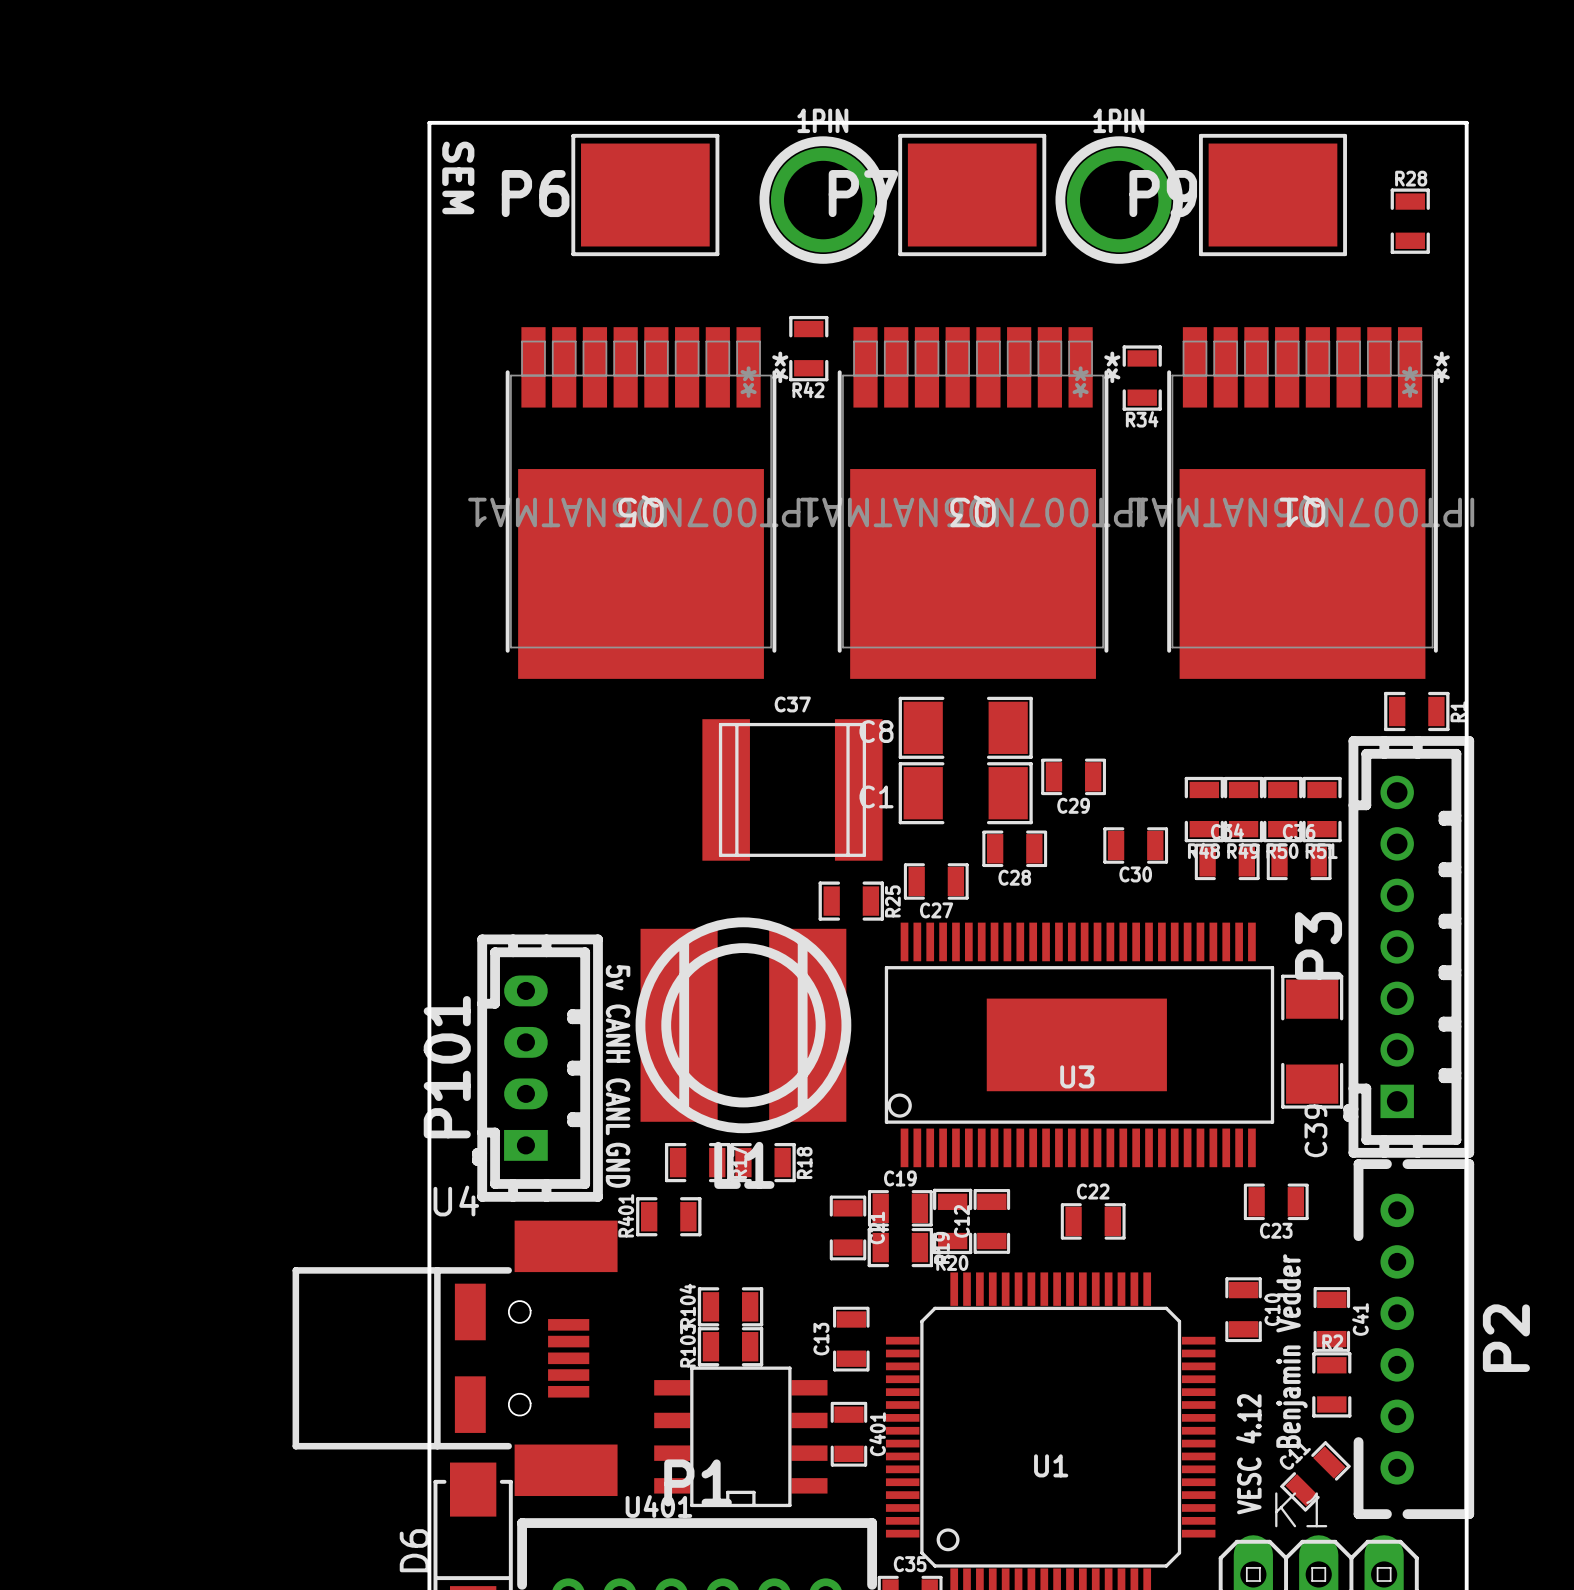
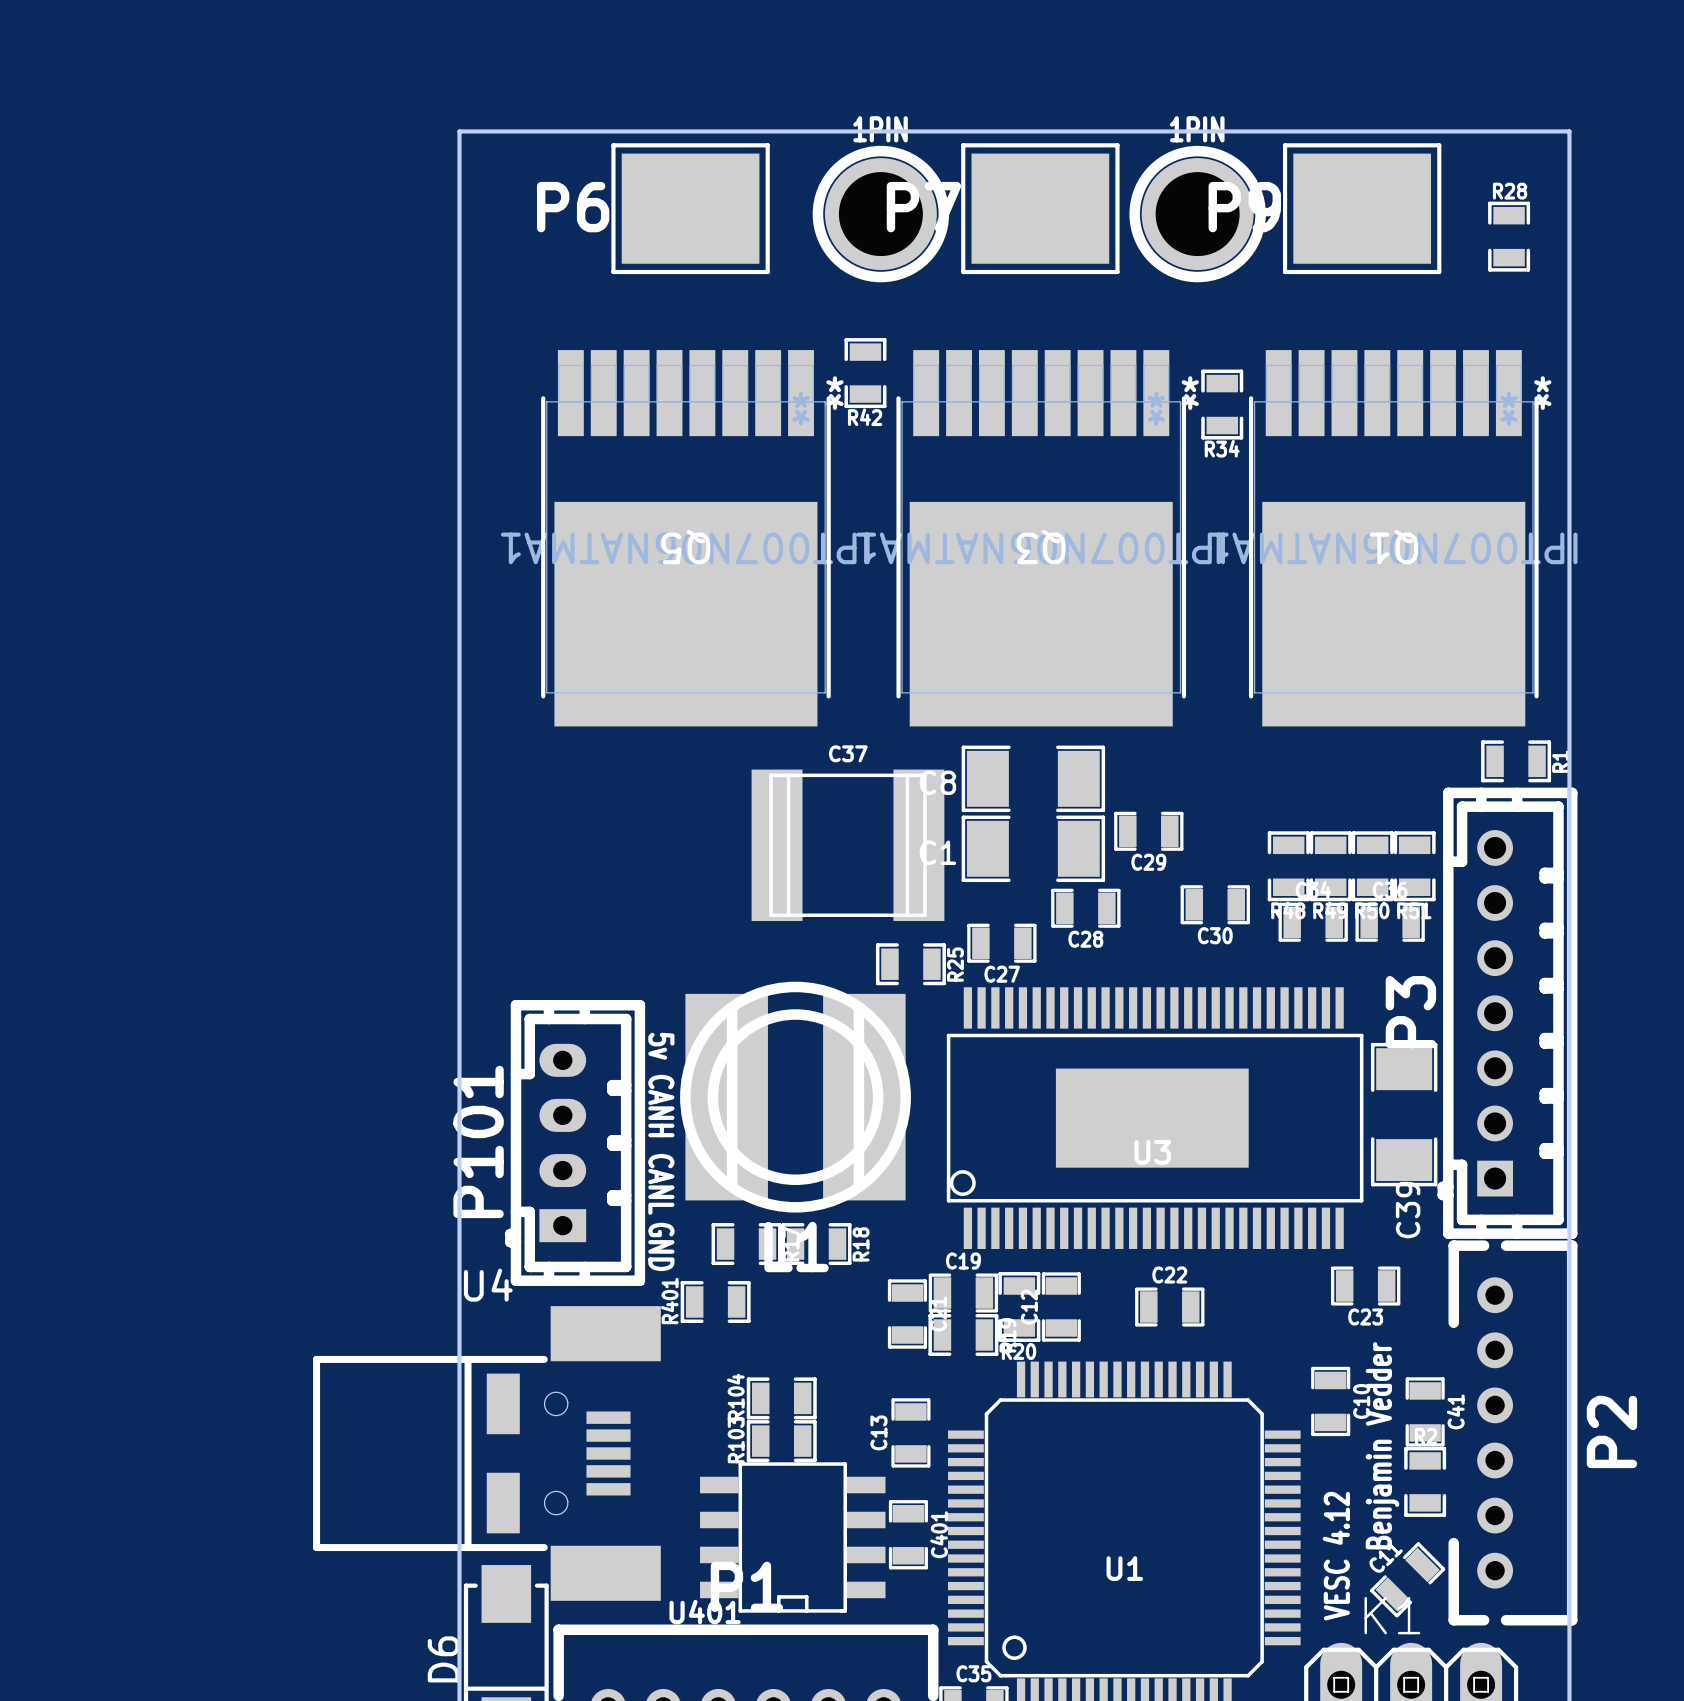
text: SEM (458, 177) -> none

